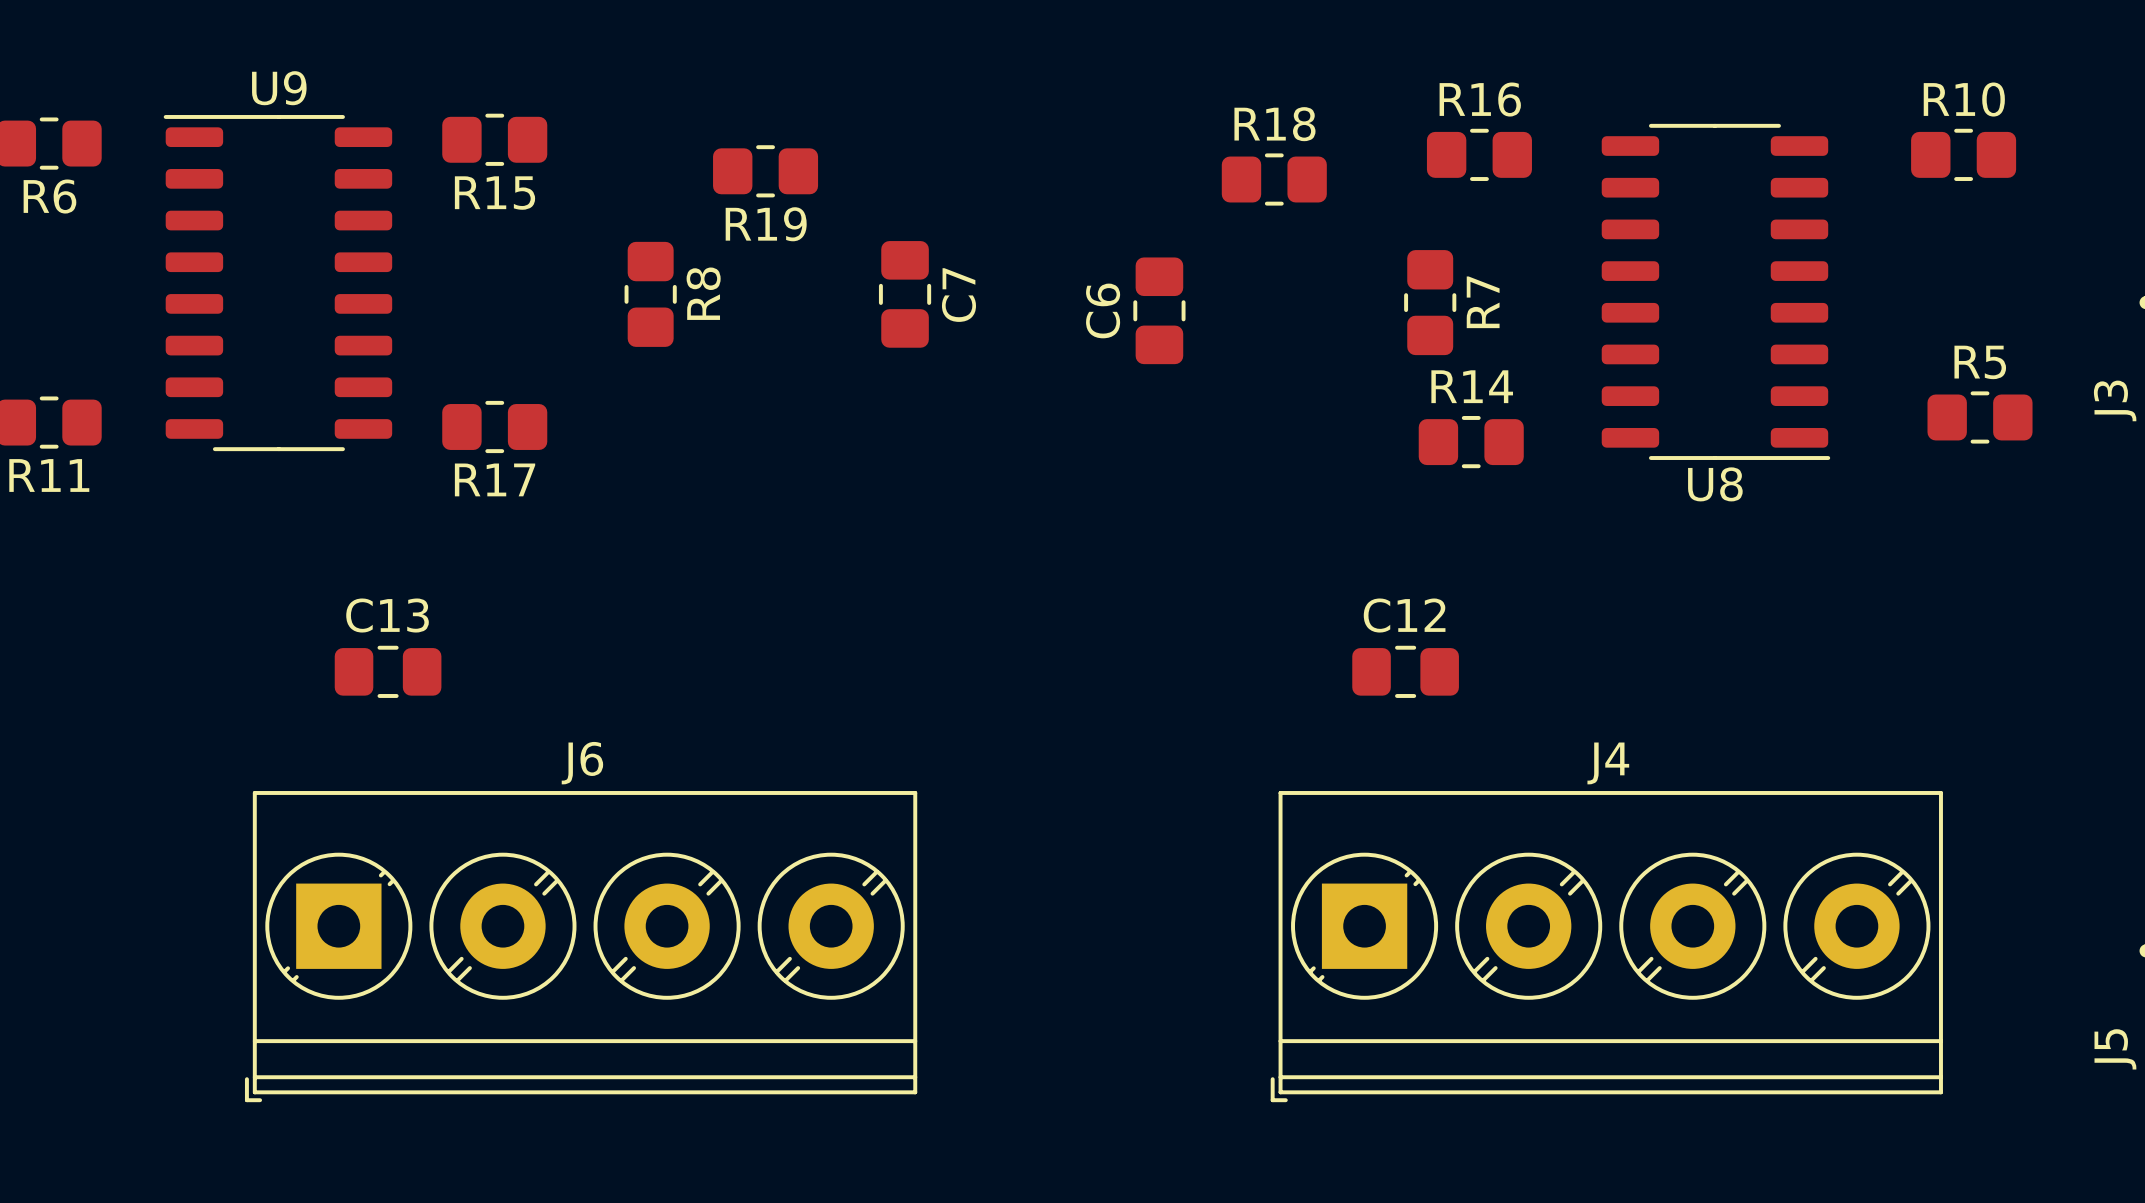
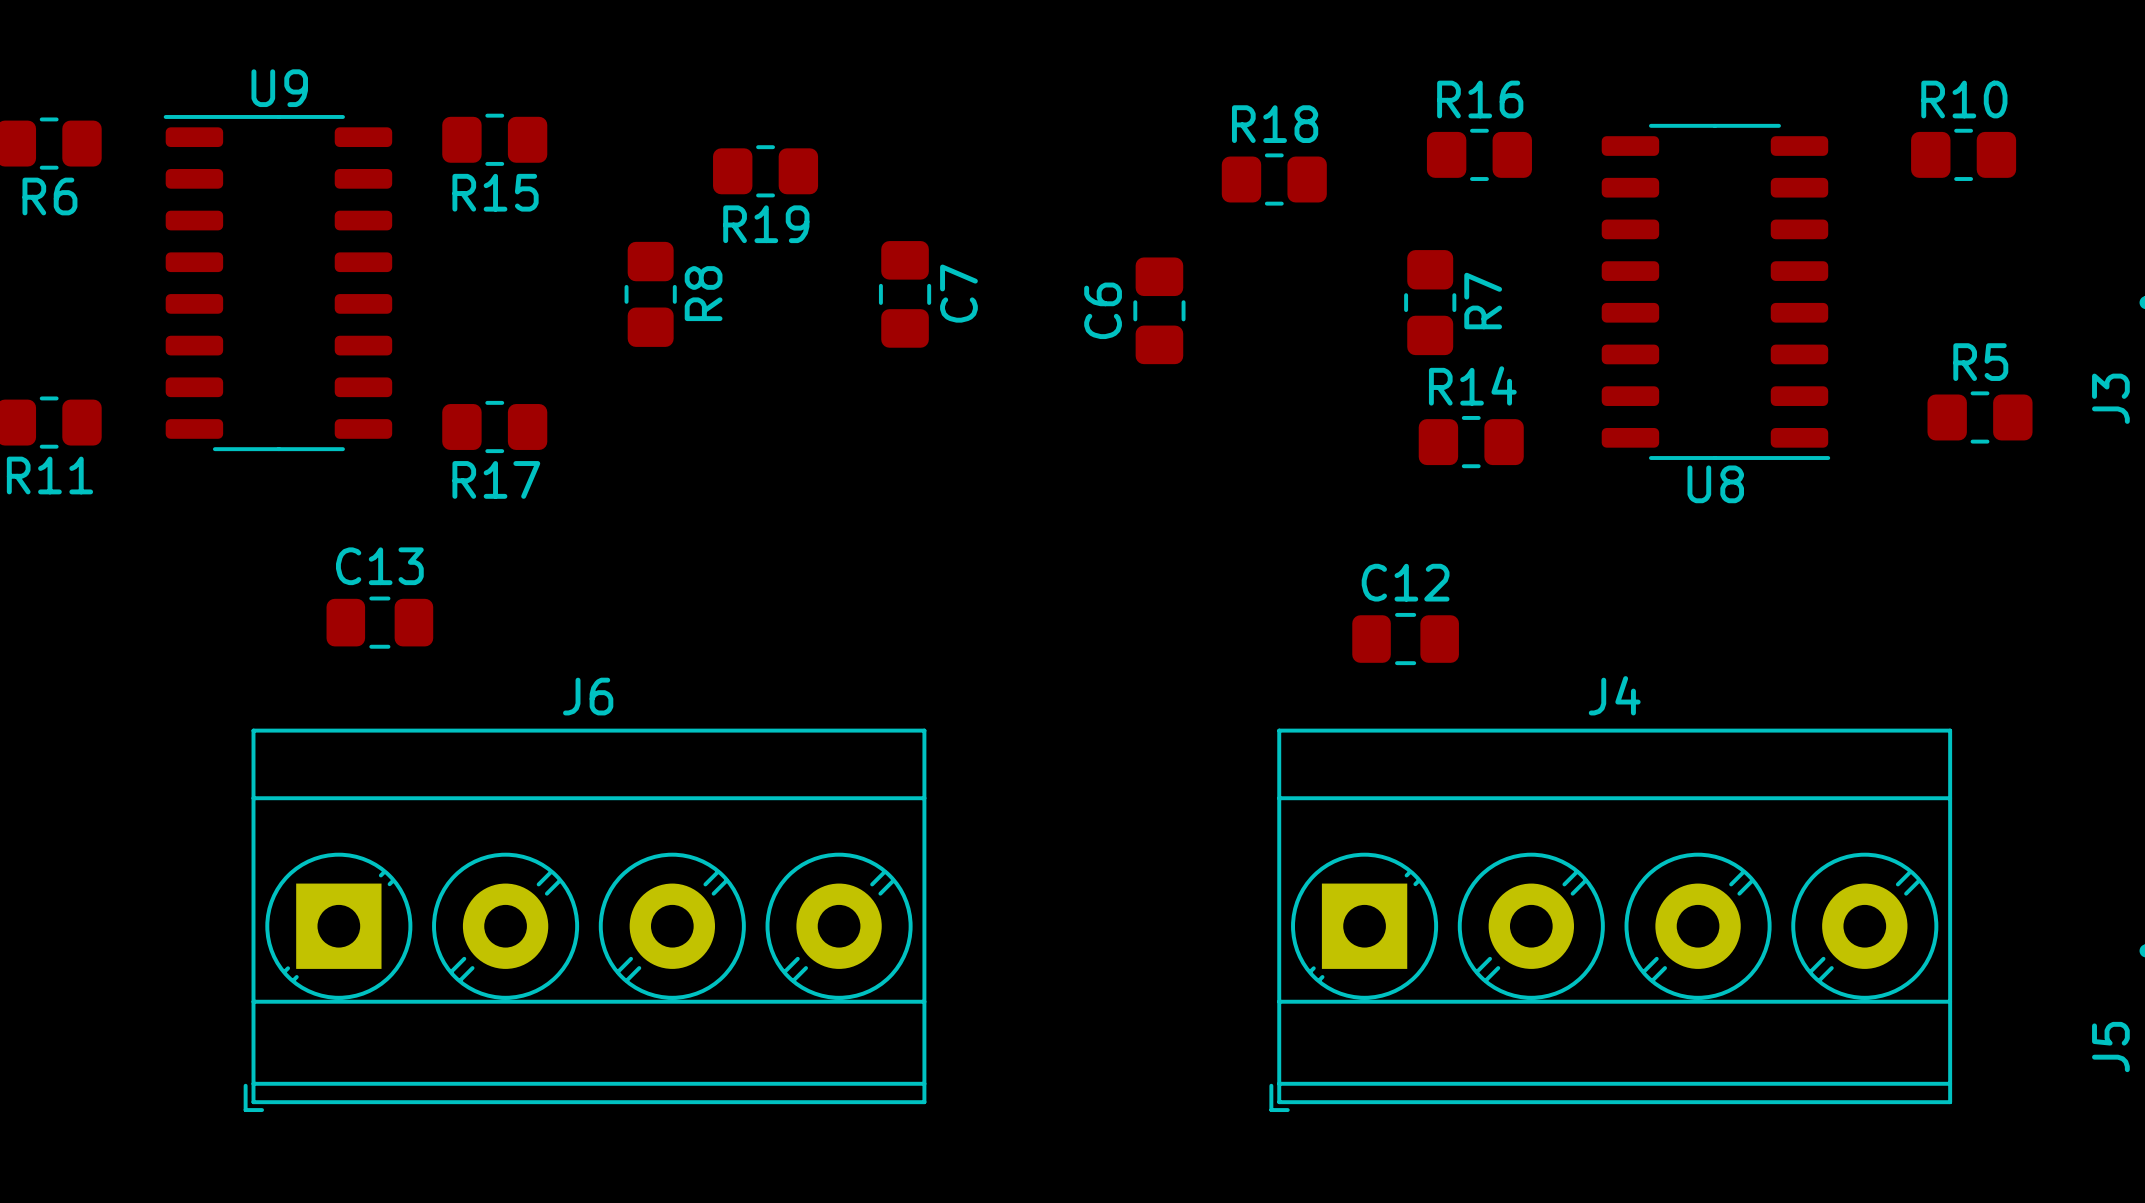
C13 position: (388, 671) -> (379, 622)
C12 position: (1405, 671) -> (1405, 639)
J6 footprint: [244, 791, 918, 1103] -> [243, 728, 927, 1113]
J4 footprint: [1270, 791, 1943, 1103] -> [1269, 728, 1953, 1113]

